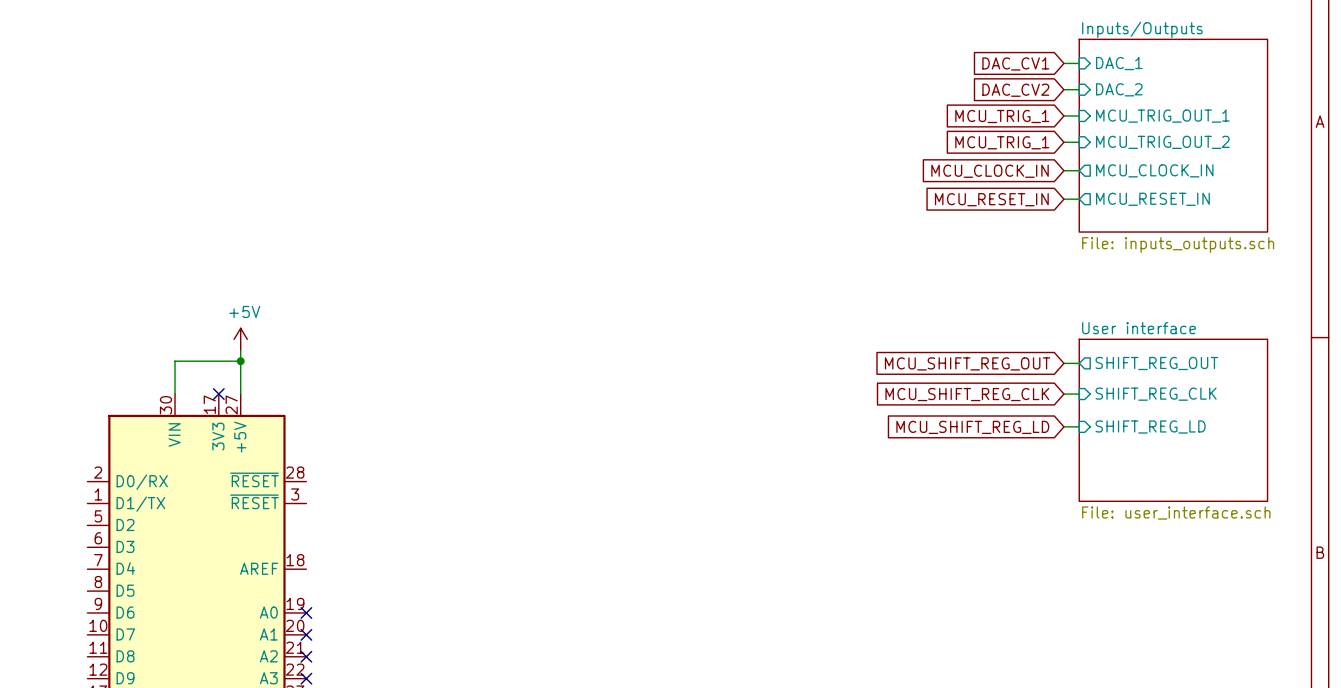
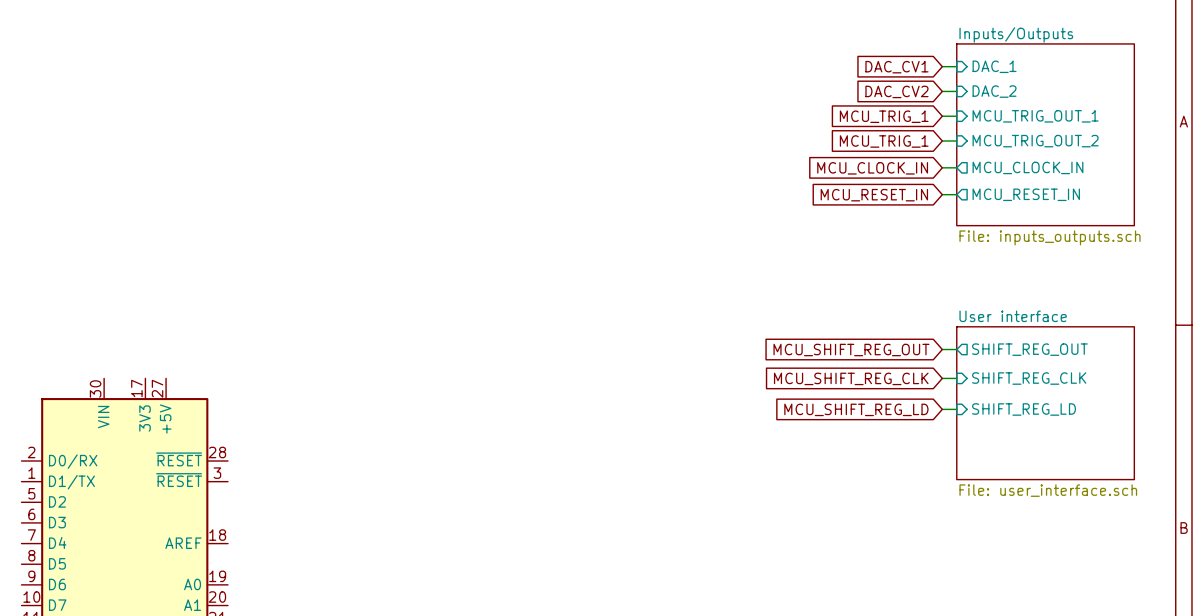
power symbol: +5V (240, 339) -> none
wire: (240, 350) (240, 394) -> none
wire: (240, 361) (175, 361) (175, 394) -> none
junction: (240, 361) -> none
no-connect mark: (218, 394) -> none
no-connect mark: (306, 612) -> none
no-connect mark: (306, 634) -> none

